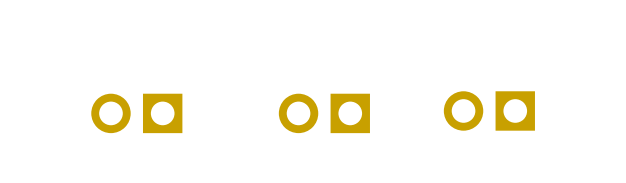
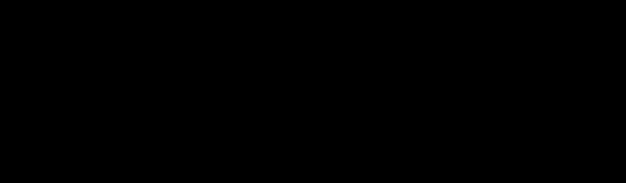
part: (489, 110) -> none
part: (136, 113) -> none
part: (324, 113) -> none

